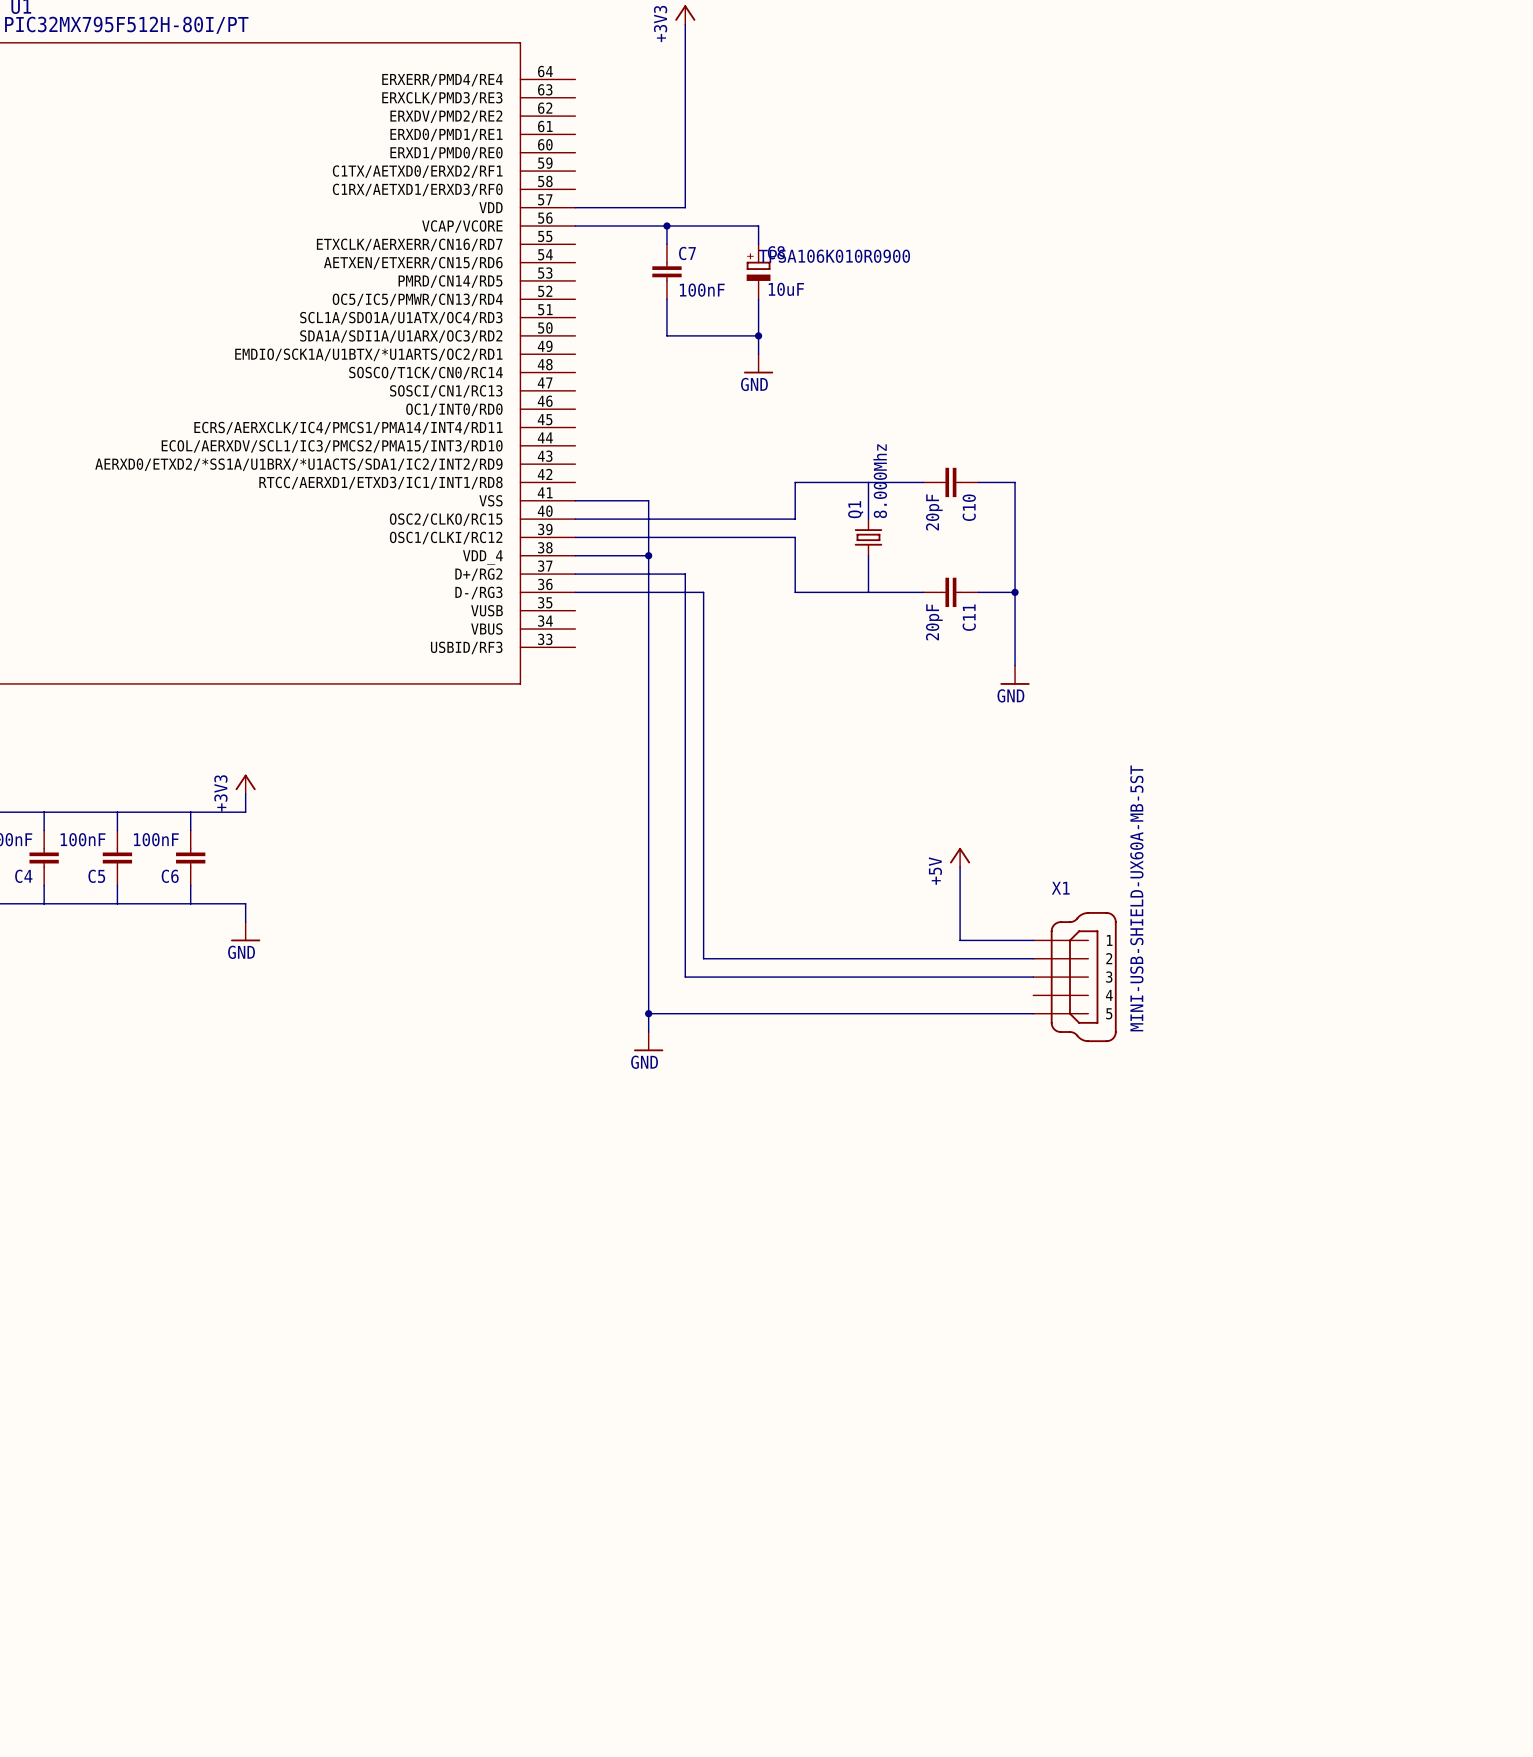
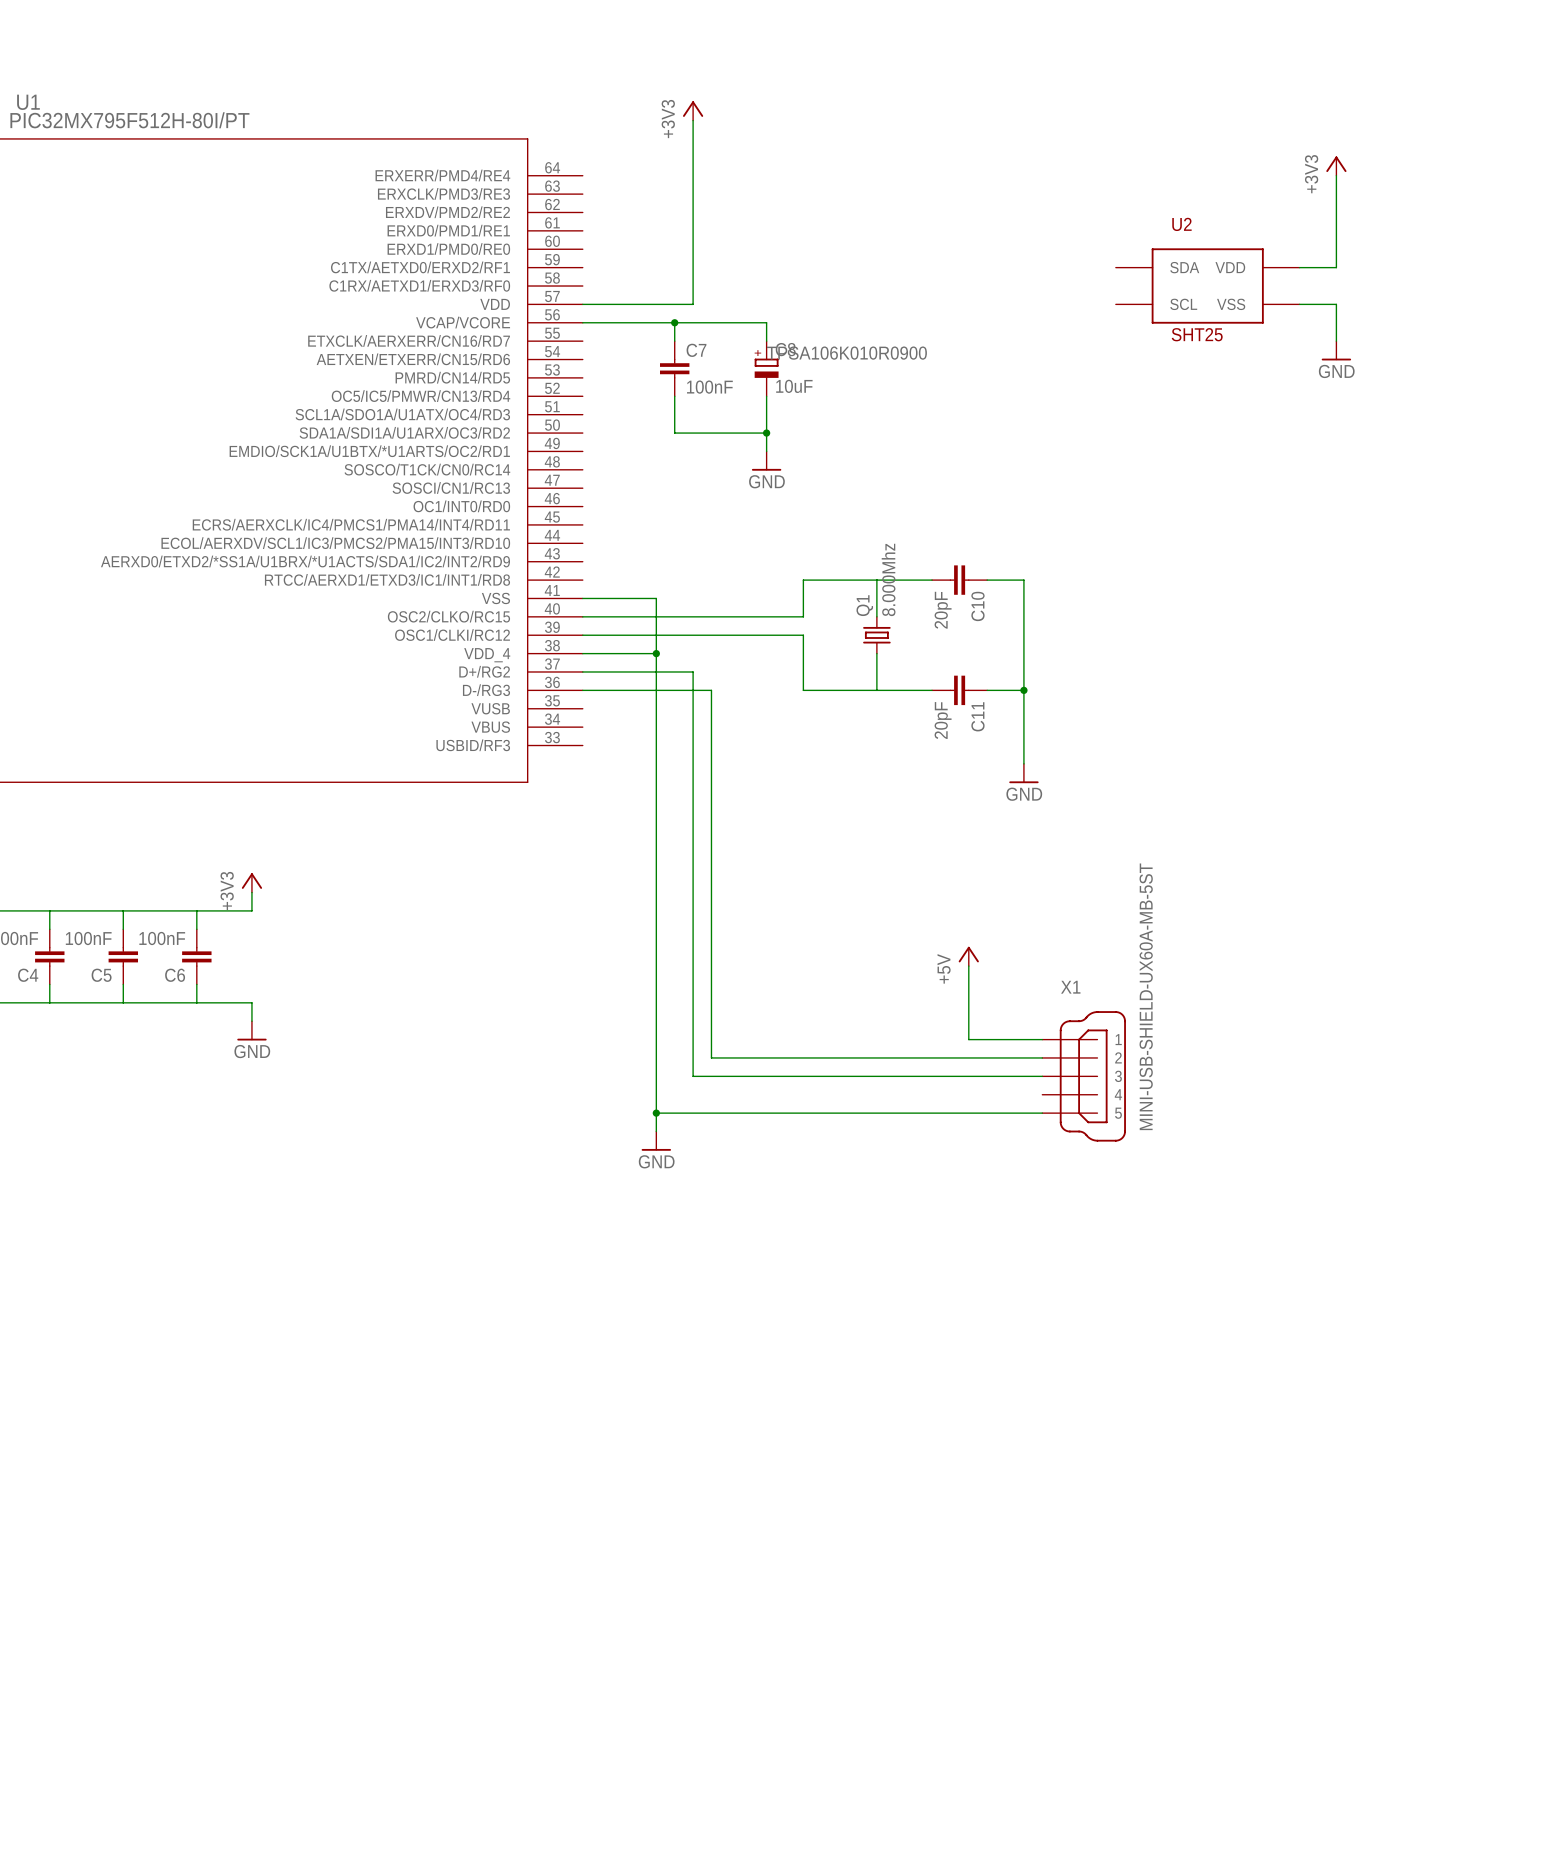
power symbol: none -> +3V3 (1336, 166)
wire: none -> (1336, 175) (1336, 267) (1299, 267)
U2: none -> SHT25 (1207, 286)
wire: none -> (1299, 304) (1336, 304) (1336, 341)
power symbol: none -> GND (1336, 350)

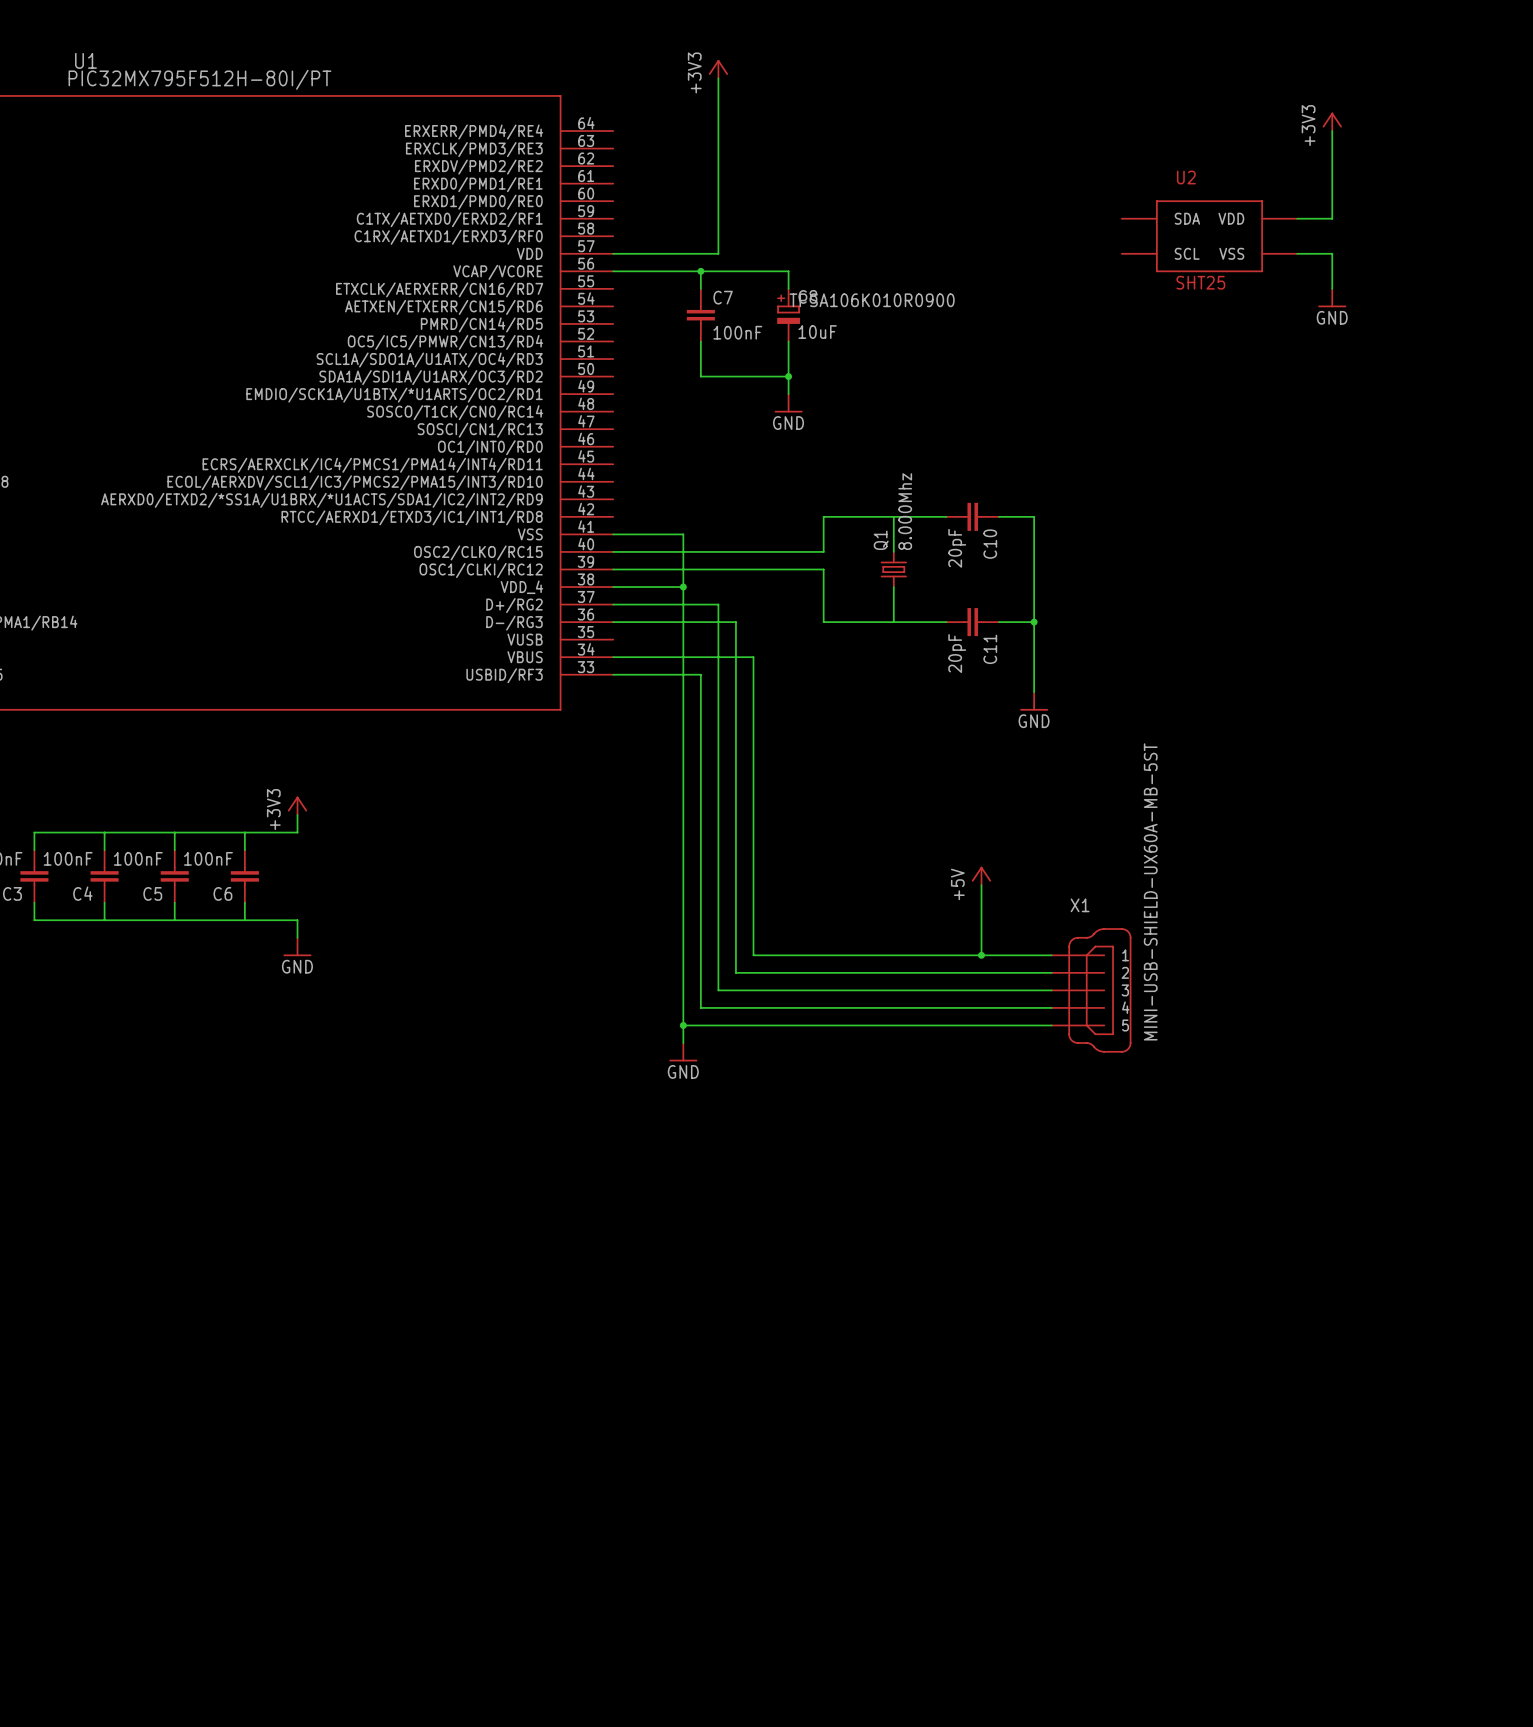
wire: none -> (613, 657) (753, 657) (753, 955) (981, 955)
wire: none -> (613, 674) (700, 674) (700, 1007) (1051, 1007)
junction: none -> (981, 955)

